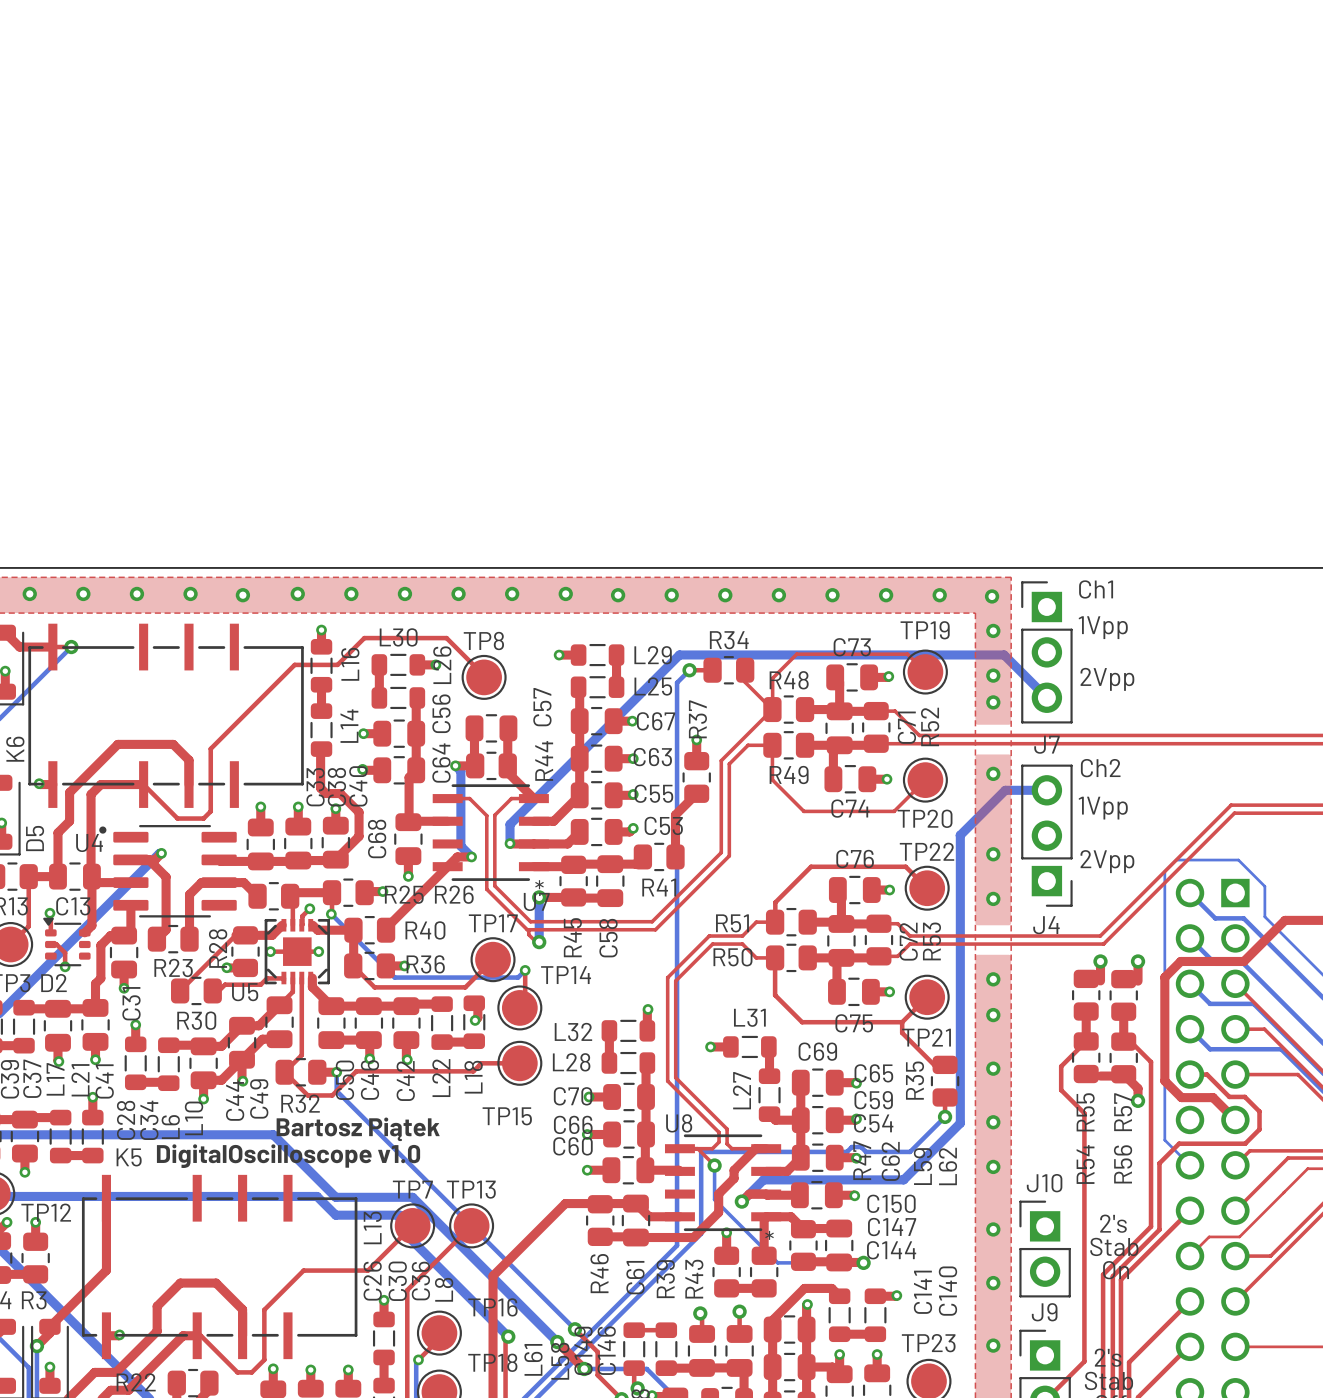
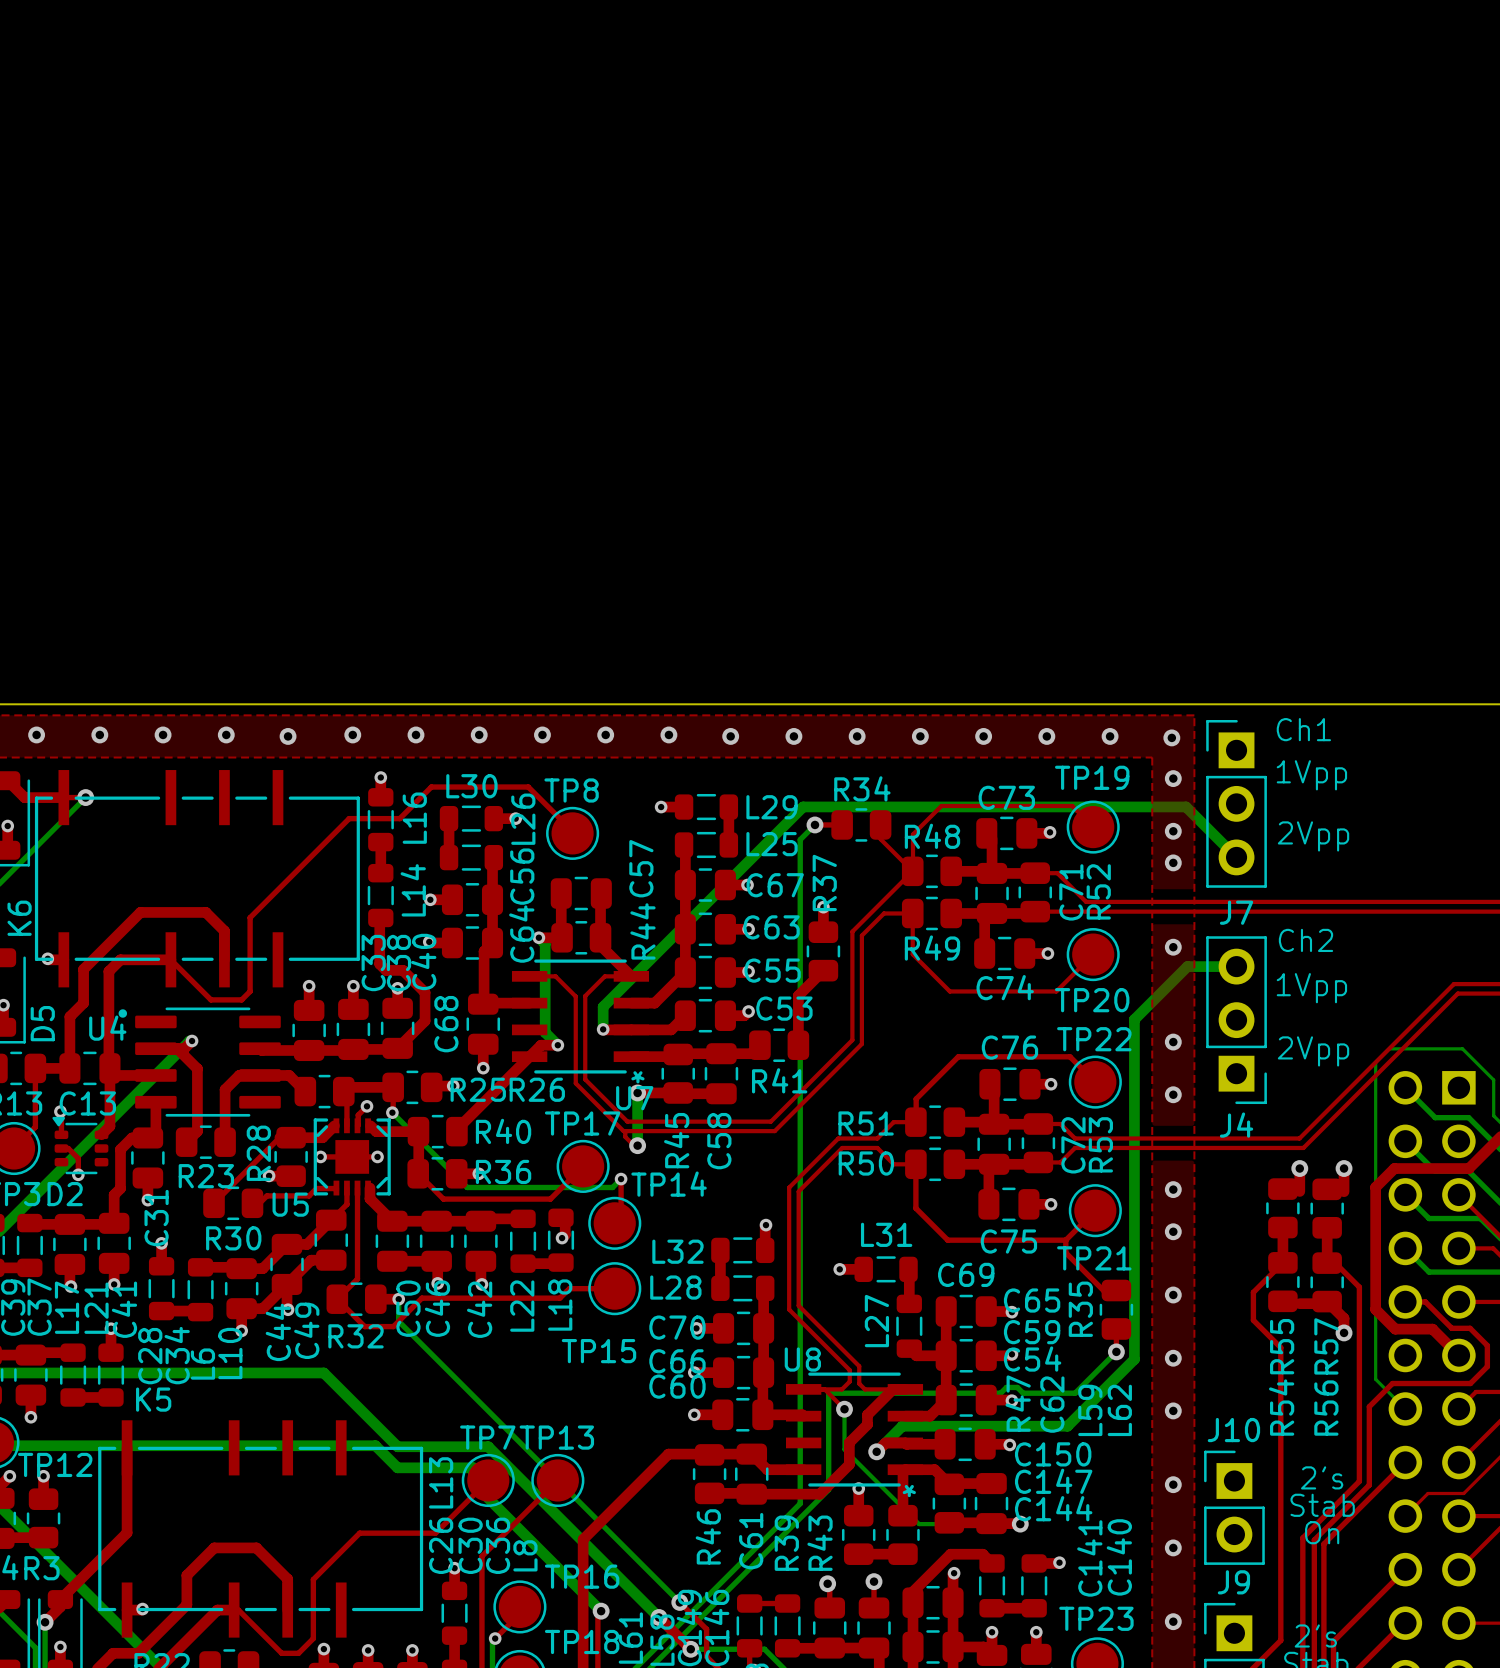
text: Bartosz Piątek (358, 1129) -> none
text: DigitalOscilloscope v1.0 (288, 1156) -> none

